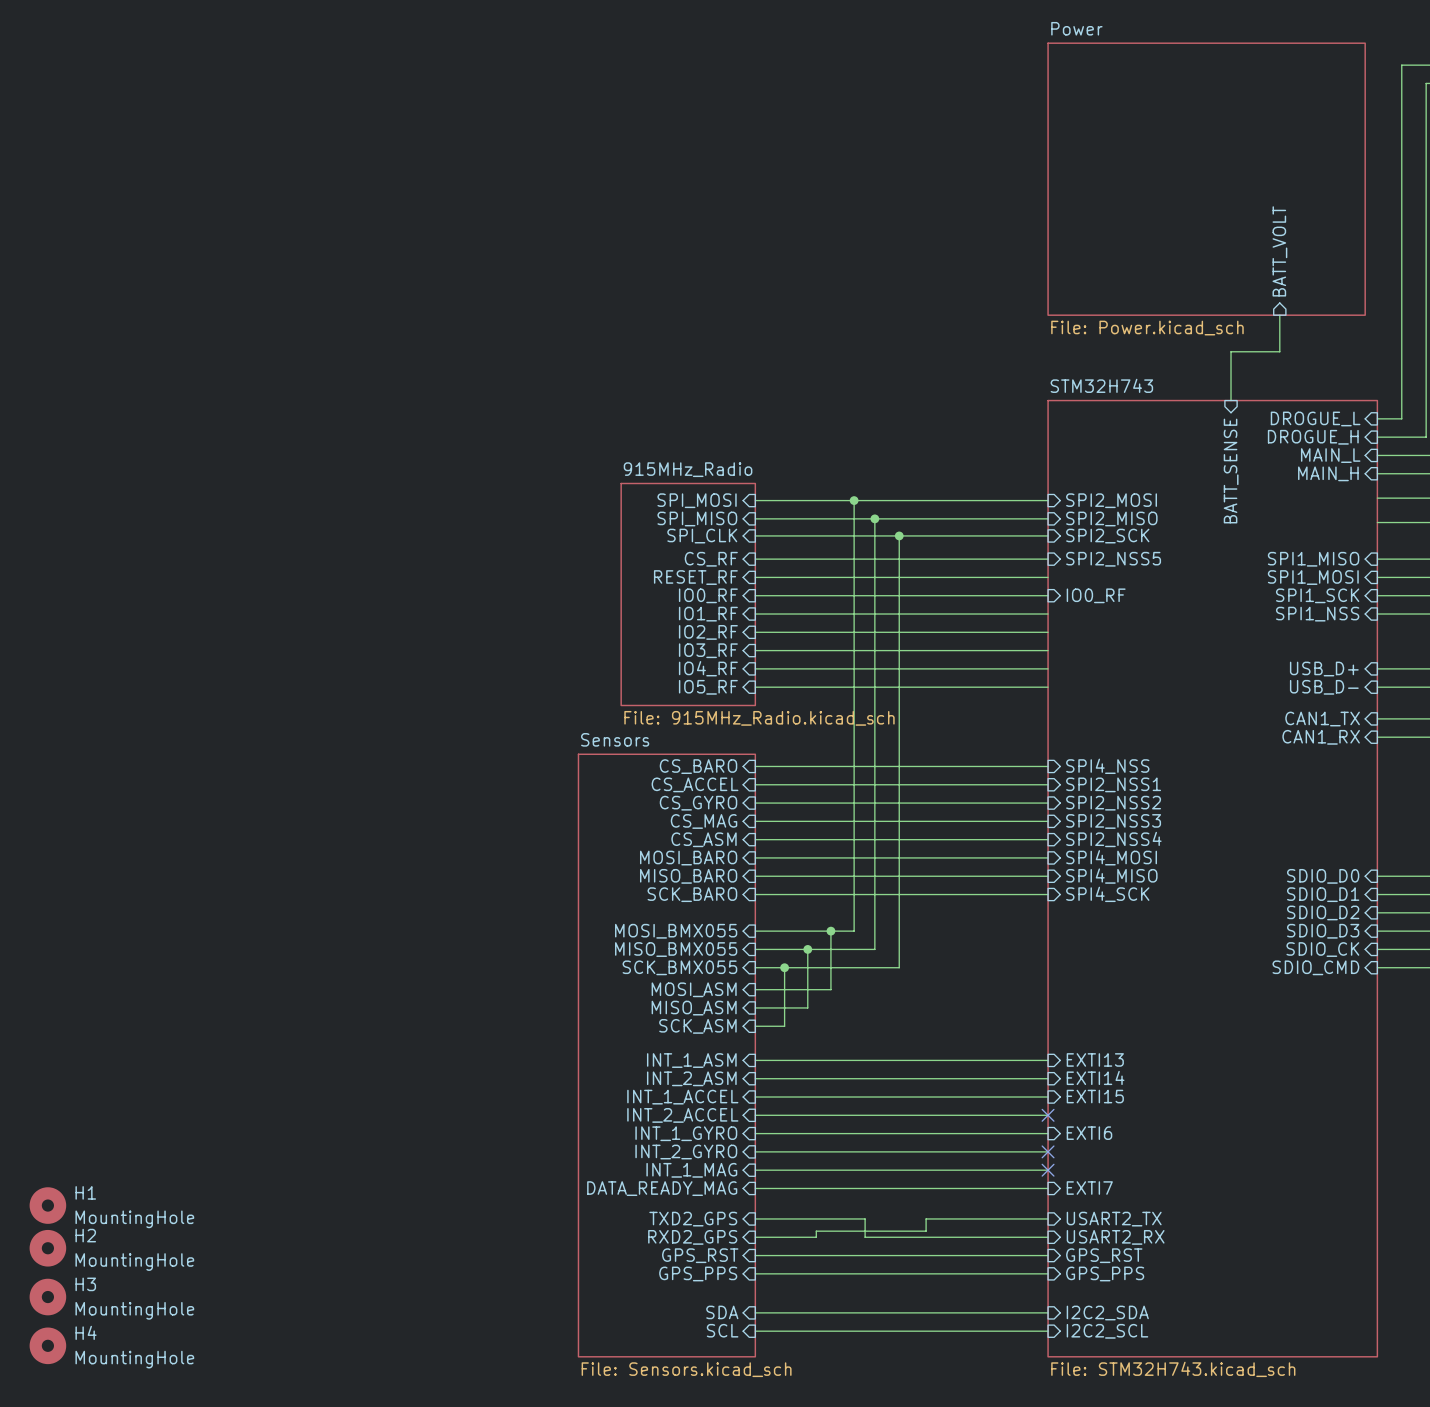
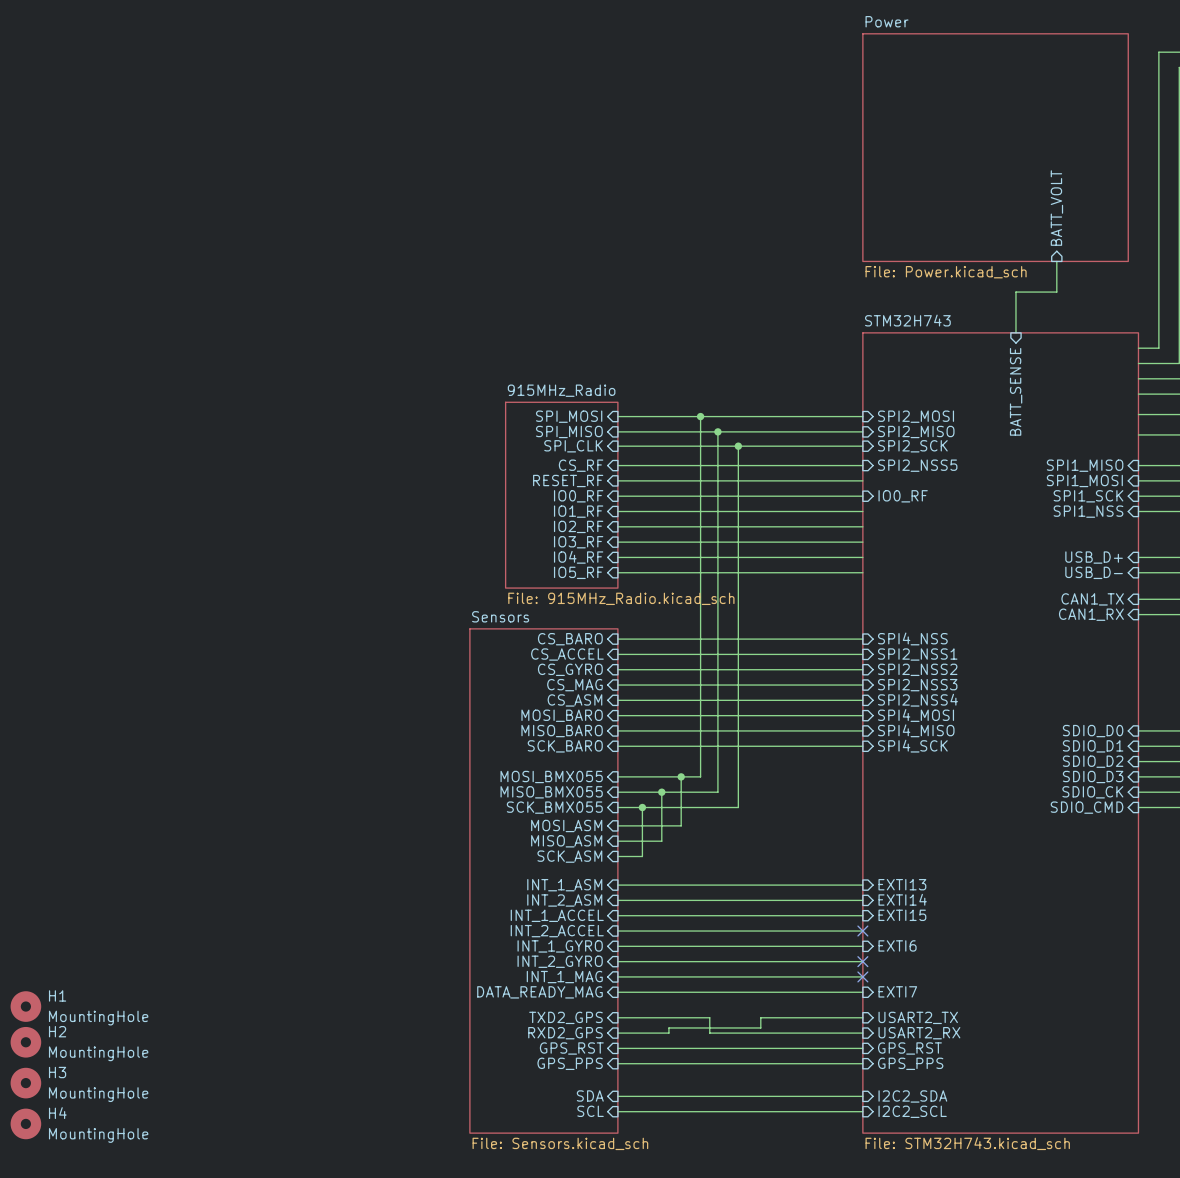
sheet pin: DROGUE_L (1315, 418) -> none
sheet pin: DROGUE_H (1313, 437) -> none
sheet pin: MAIN_L (1330, 455) -> none
sheet pin: MAIN_H (1328, 473) -> none

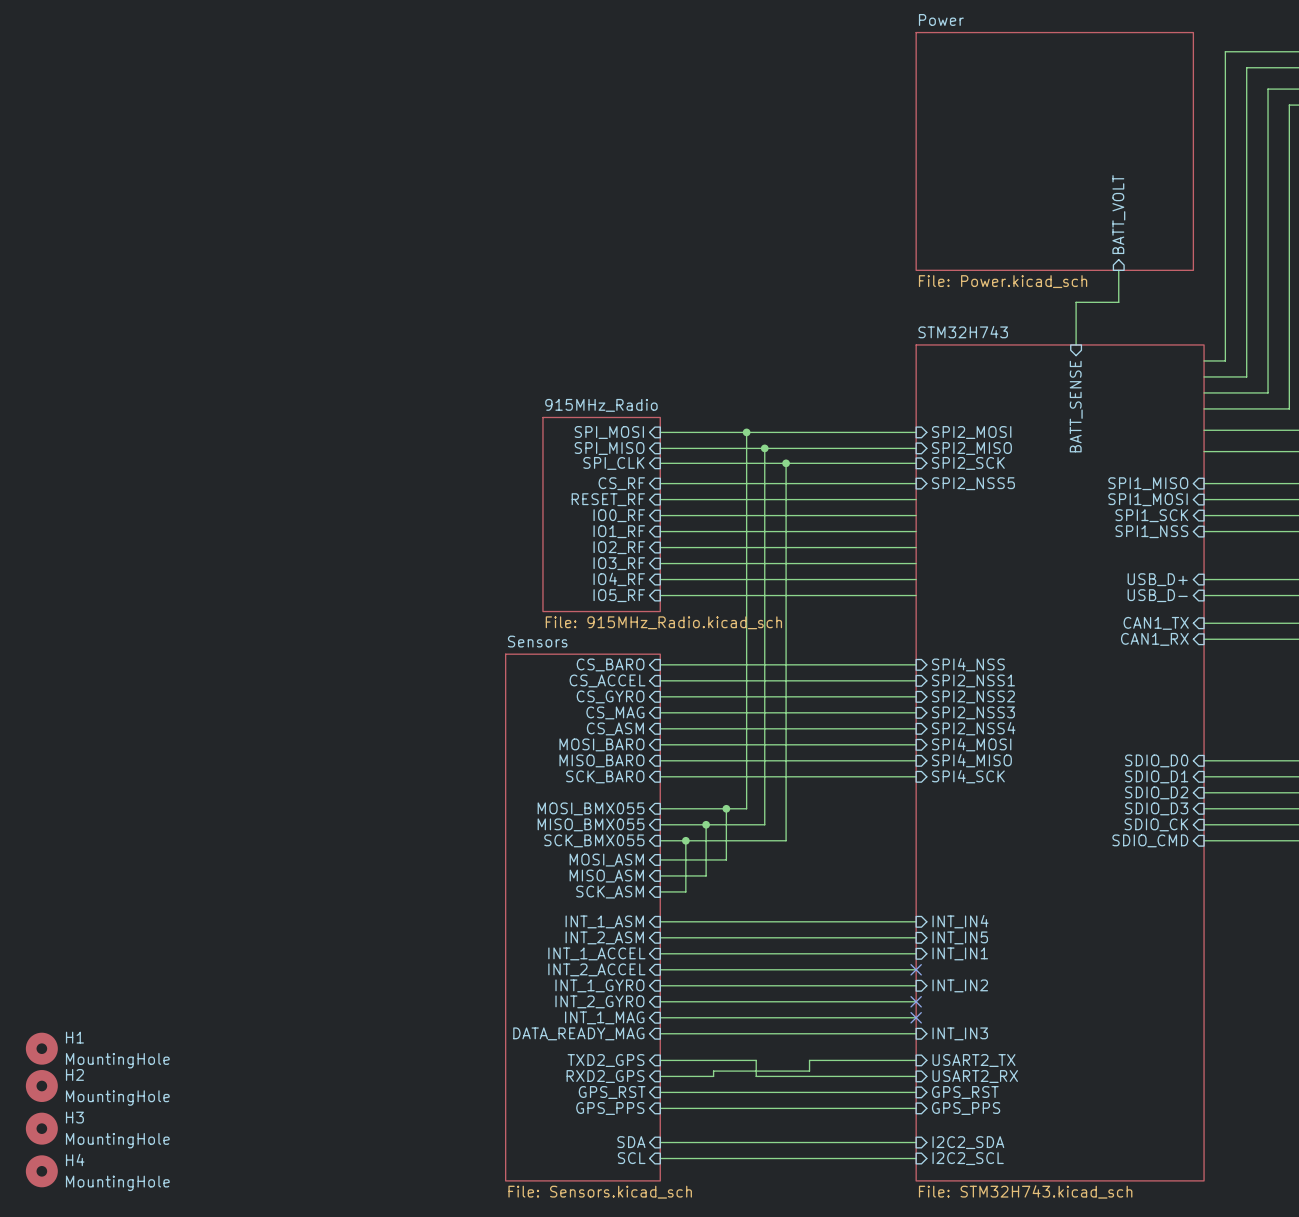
sheet pin: IO0_RF (903, 496) -> none
sheet pin: EXTI13 (902, 884) -> INT_IN4 (960, 921)
sheet pin: EXTI14 (902, 899) -> INT_IN5 (960, 937)
sheet pin: EXTI15 (902, 915) -> INT_IN1 (960, 953)
sheet pin: EXTI6 (897, 945) -> INT_IN2 (960, 985)
sheet pin: EXTI7 (897, 991) -> INT_IN3 (960, 1033)

